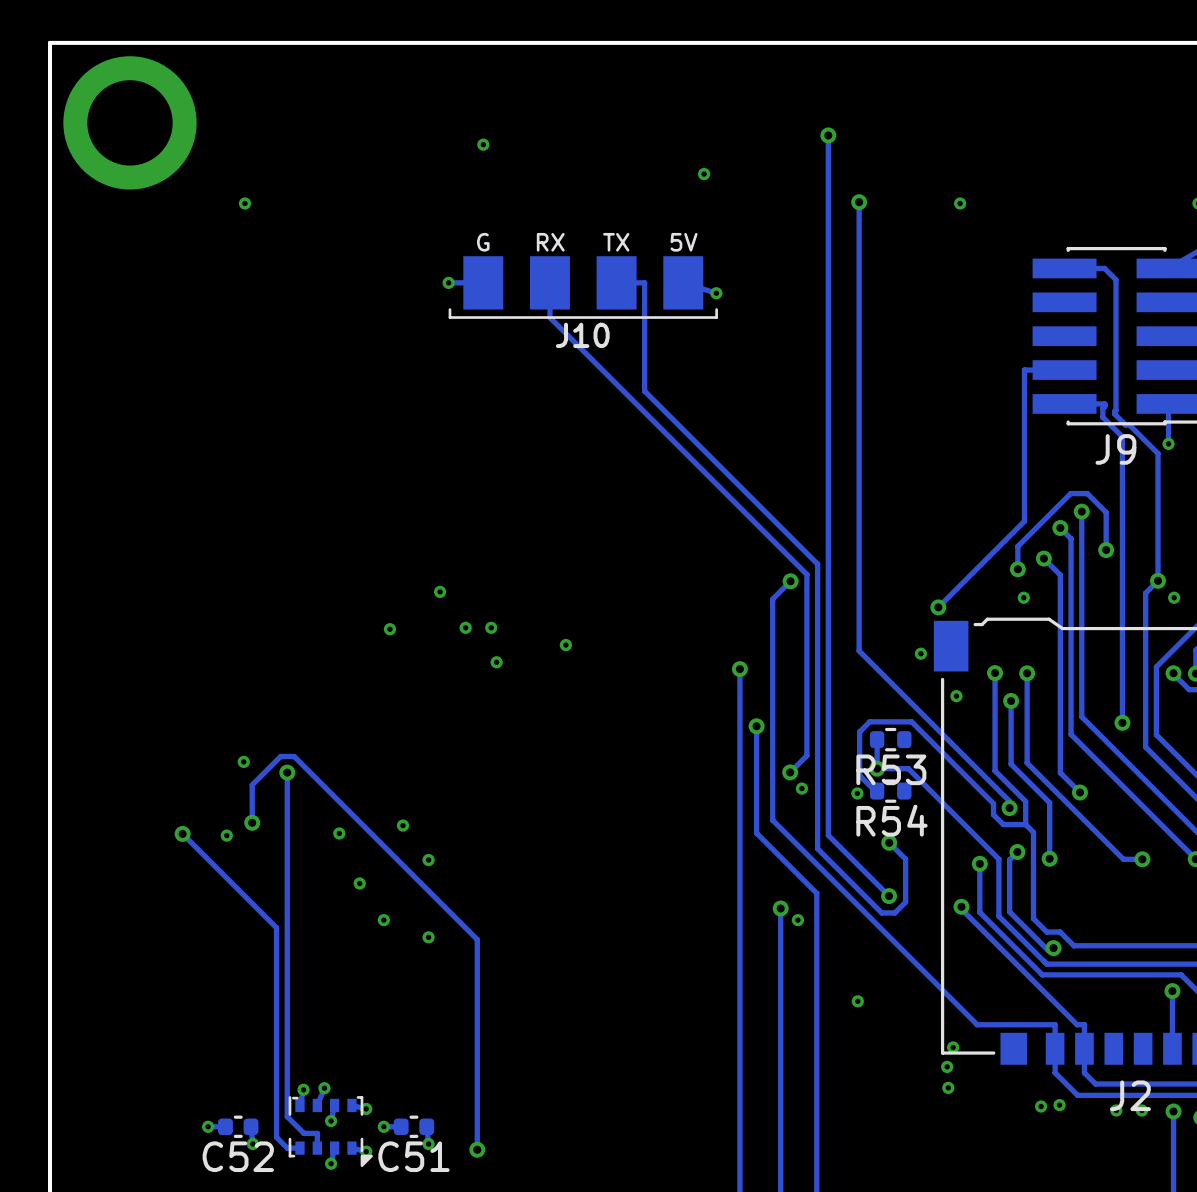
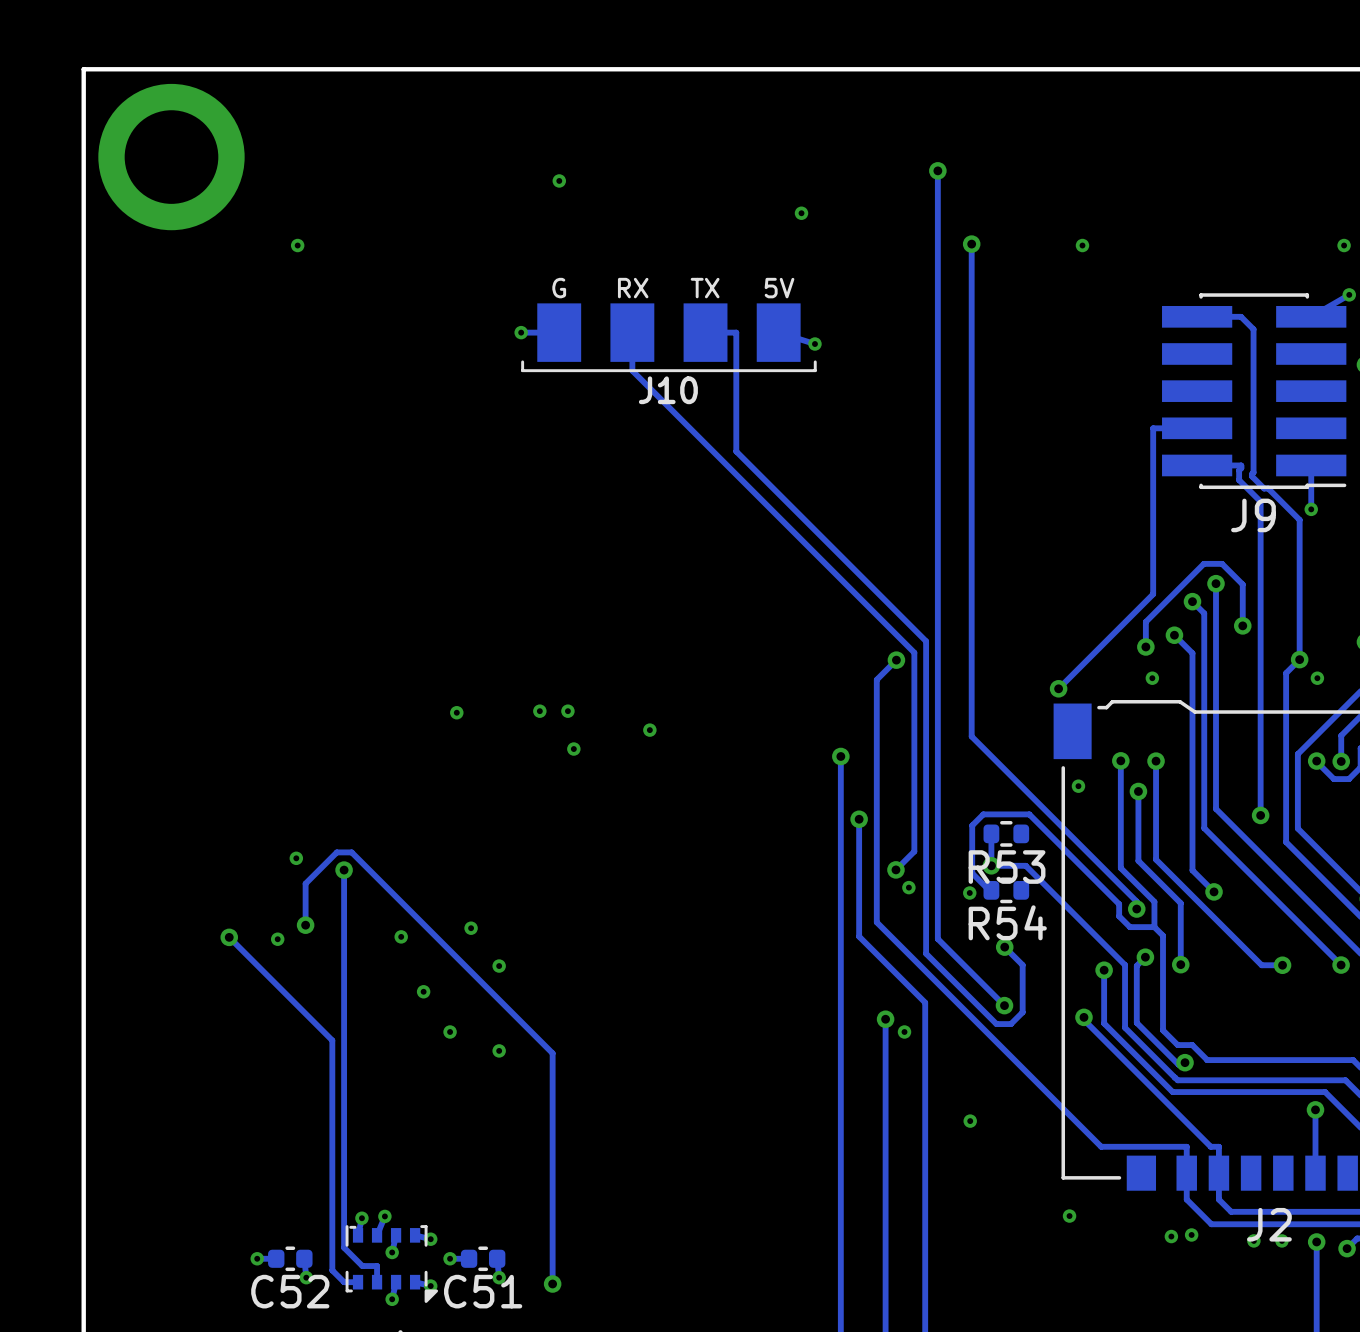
via: (440, 591) -> none
via: (920, 653) -> none
via: (953, 1047) -> none
via: (947, 1066) -> none

